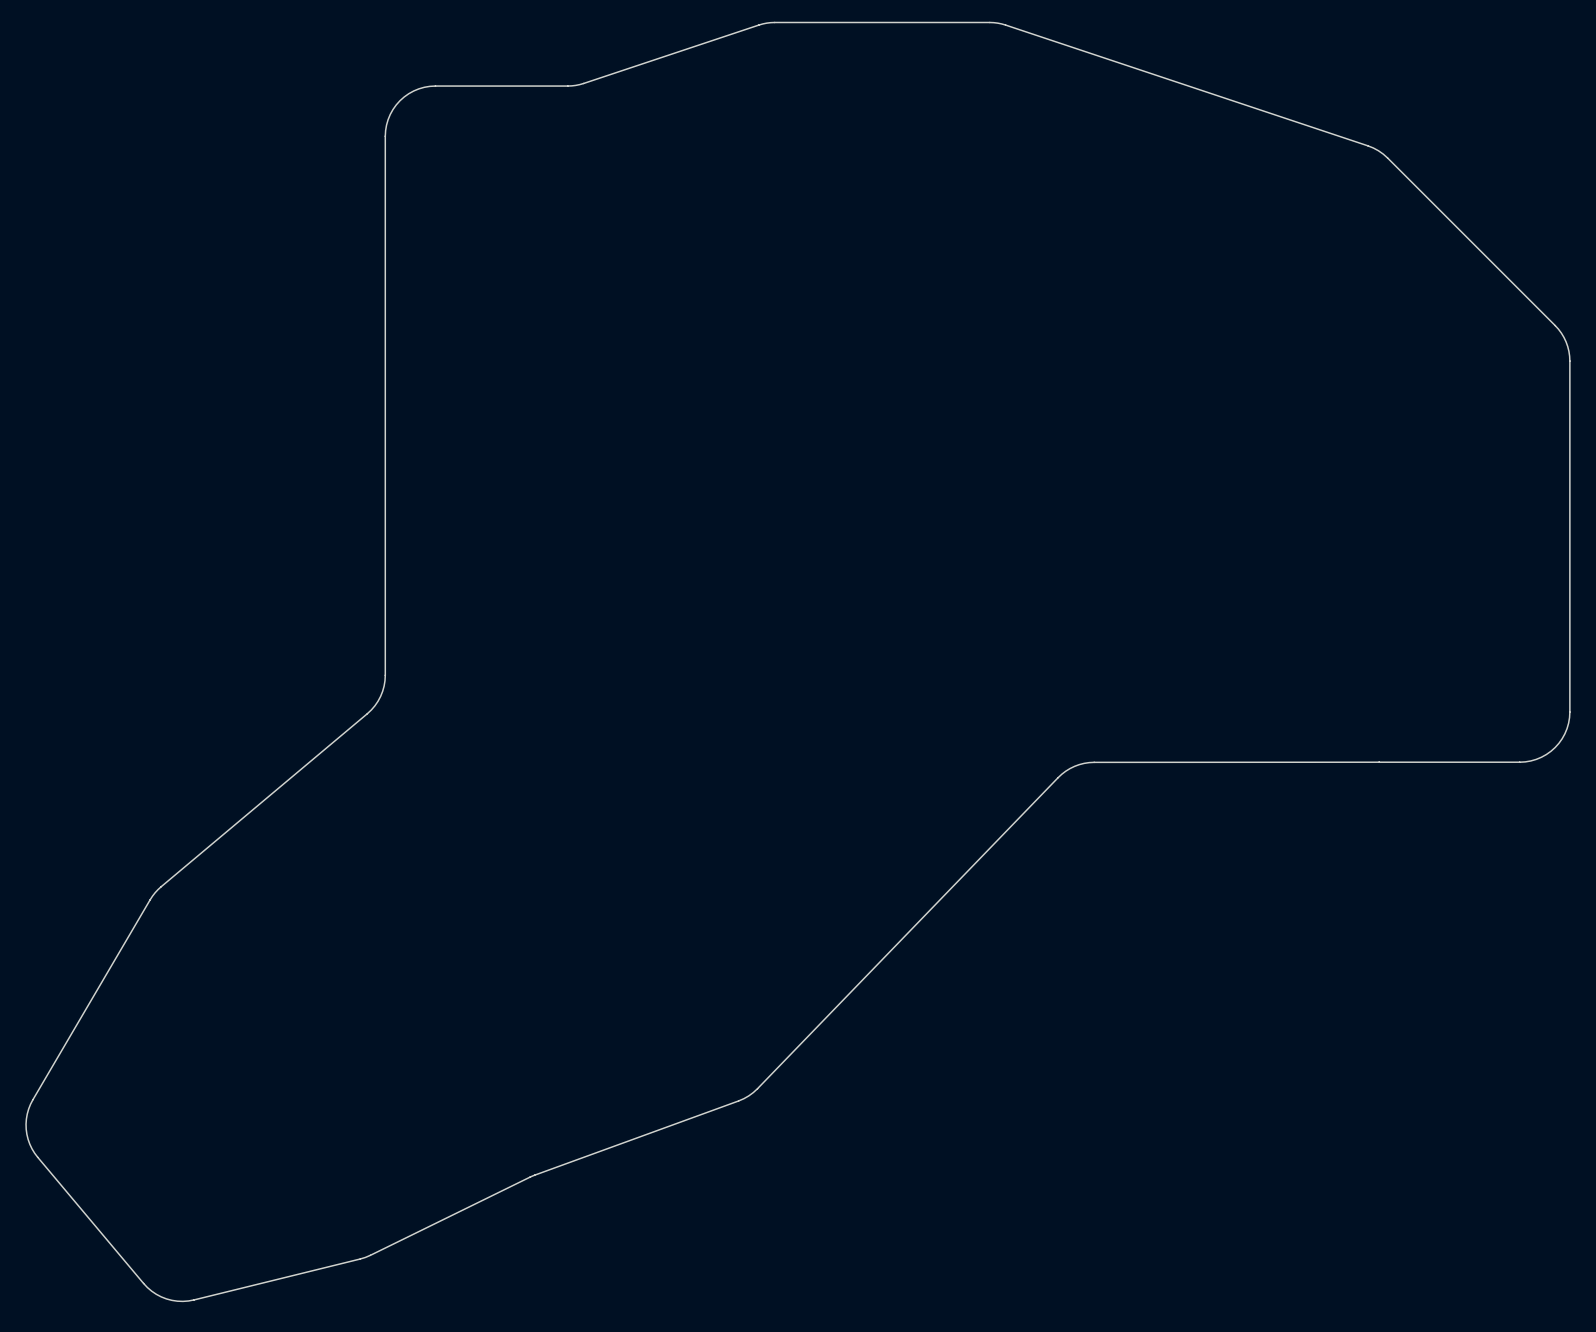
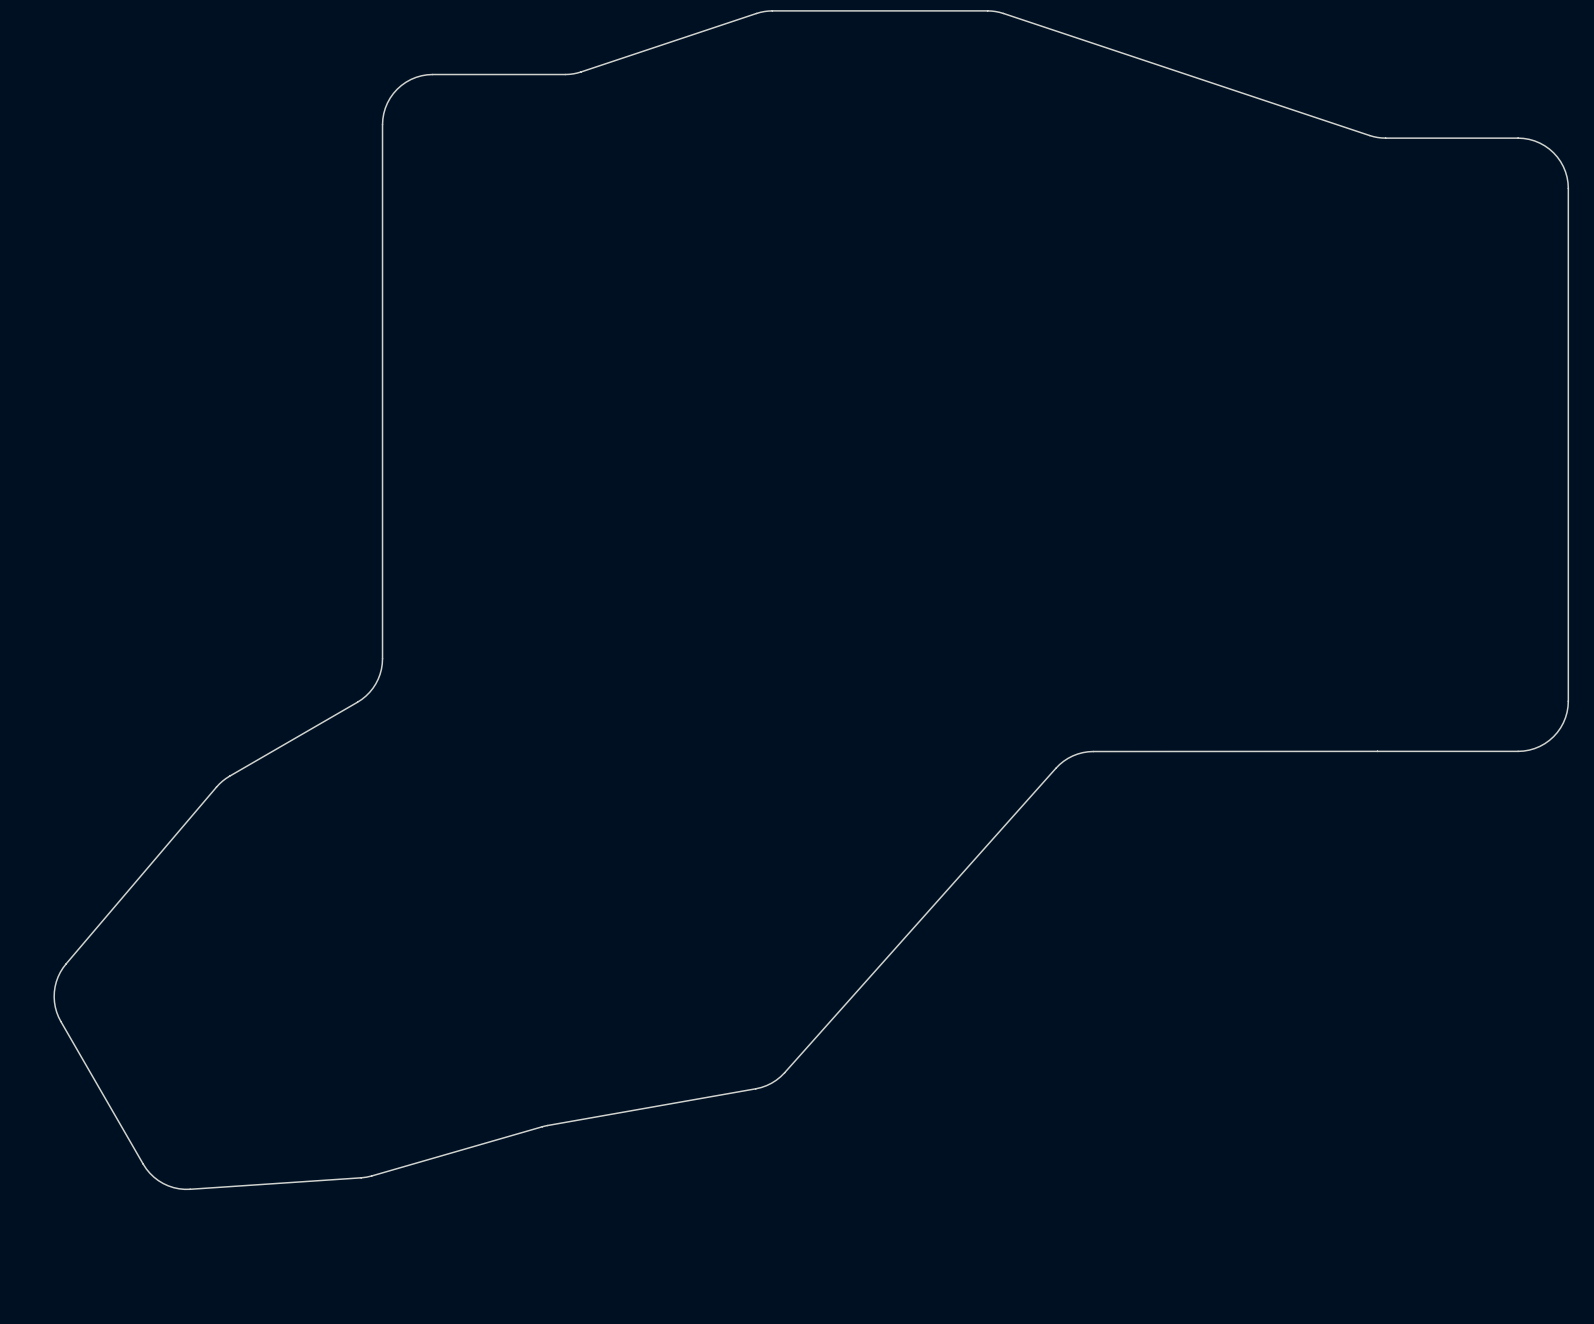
board edge: (1367, 145) (1387, 157) (1555, 325) (1566, 341) (1569, 361) -> (1366, 134) (1385, 138) (1523, 138) (1539, 143) (1553, 152) (1563, 166) (1568, 182) (1568, 349)
board edge: (385, 669) (382, 691) (371, 709) (155, 892) (28, 1109) (26, 1124) (26, 1134) (34, 1153) (143, 1283) (151, 1291) (166, 1298) (182, 1301) (194, 1299) (365, 1257) (532, 1176) (748, 1095) (1058, 777) (1074, 766) (1095, 762) -> (382, 658) (380, 674) (375, 683) (361, 699) (219, 784) (66, 963) (58, 976) (54, 991) (54, 1002) (60, 1021) (143, 1164) (153, 1177) (168, 1185) (190, 1189) (366, 1177) (545, 1126) (766, 1085) (784, 1072) (1055, 768) (1072, 755) (1093, 751)

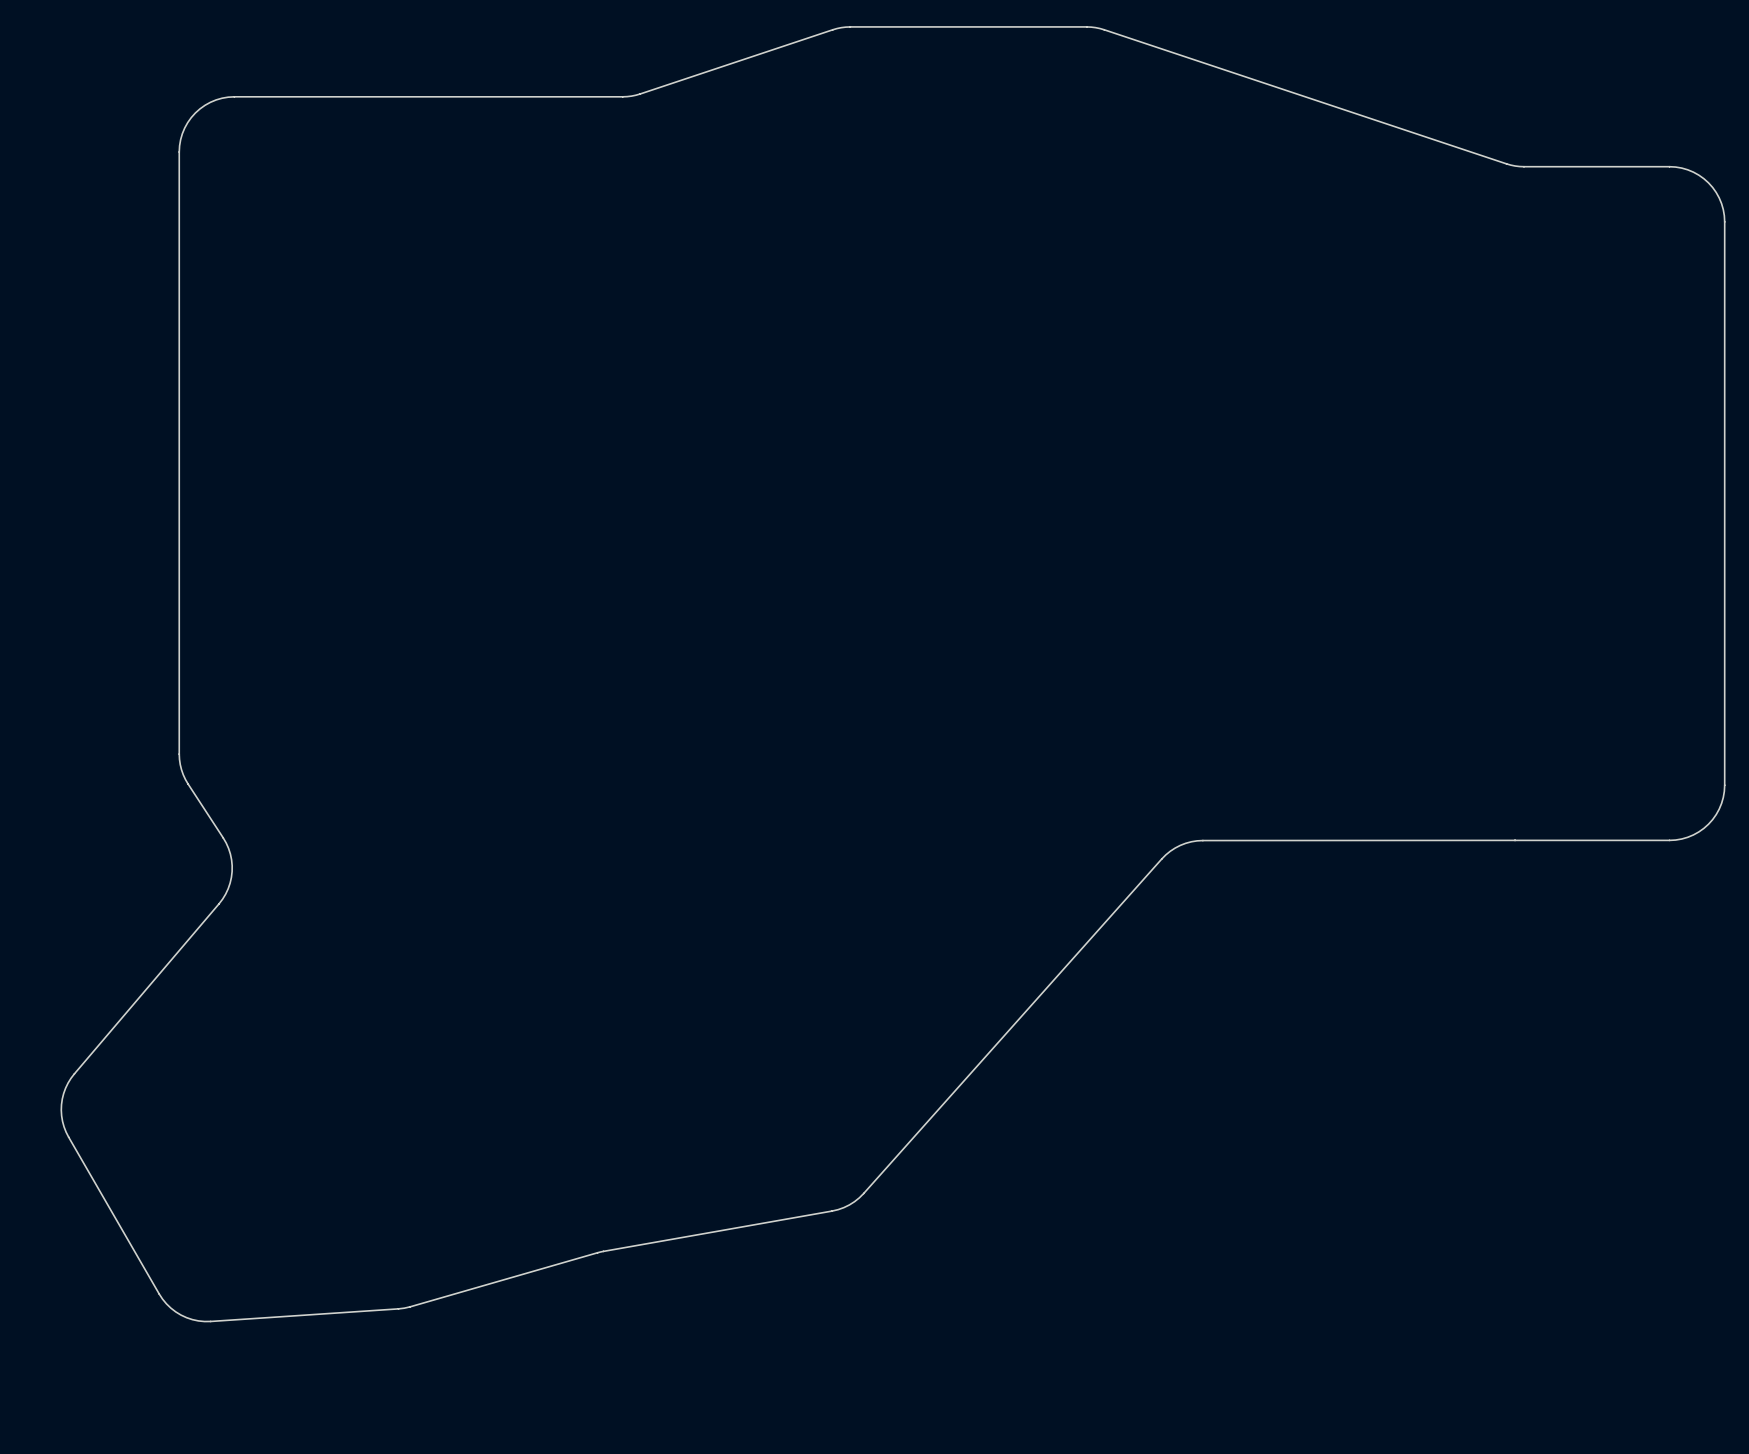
board edge: (432, 74) (416, 77) (397, 89) (387, 102) (382, 119) (382, 658) (380, 674) (372, 688) (361, 699) (225, 778) (197, 809) -> (477, 96) (228, 97) (205, 105) (195, 112) (184, 128) (179, 152) (179, 754)
board edge: none -> (179, 754) (181, 769) (185, 779) (223, 837) (230, 854) (231, 877) (225, 894) (219, 903)

